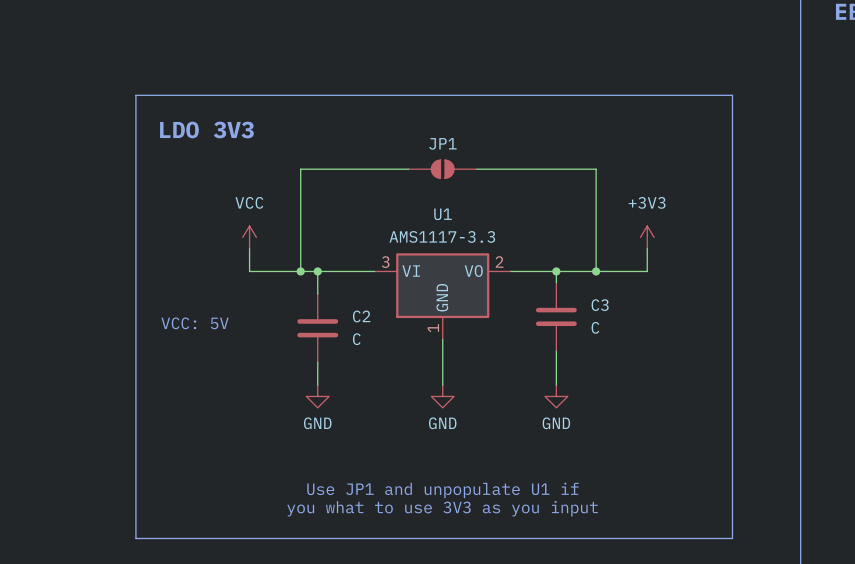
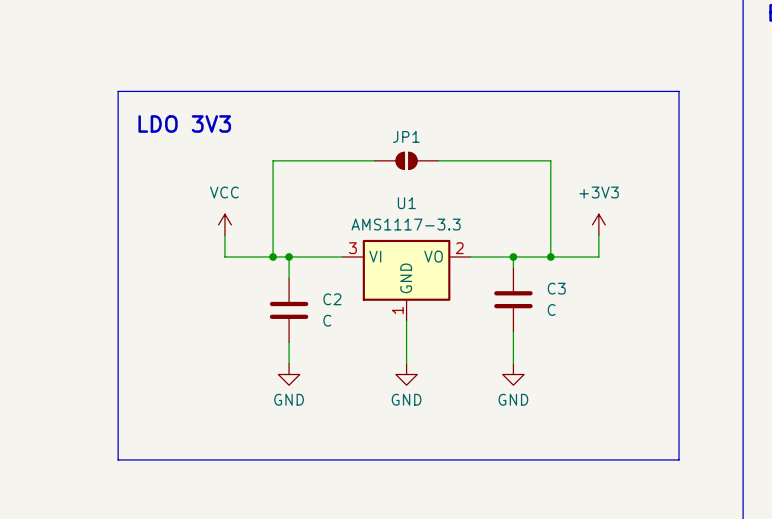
text: VCC: 5V (195, 323) -> none
line: (135, 487) (135, 538) (732, 538) (732, 487) -> (118, 459) (679, 459)
text: Use JP1 and unpopulate U1 if (442, 490) -> none
text: you what to use 3V3 as you input (442, 508) -> none

